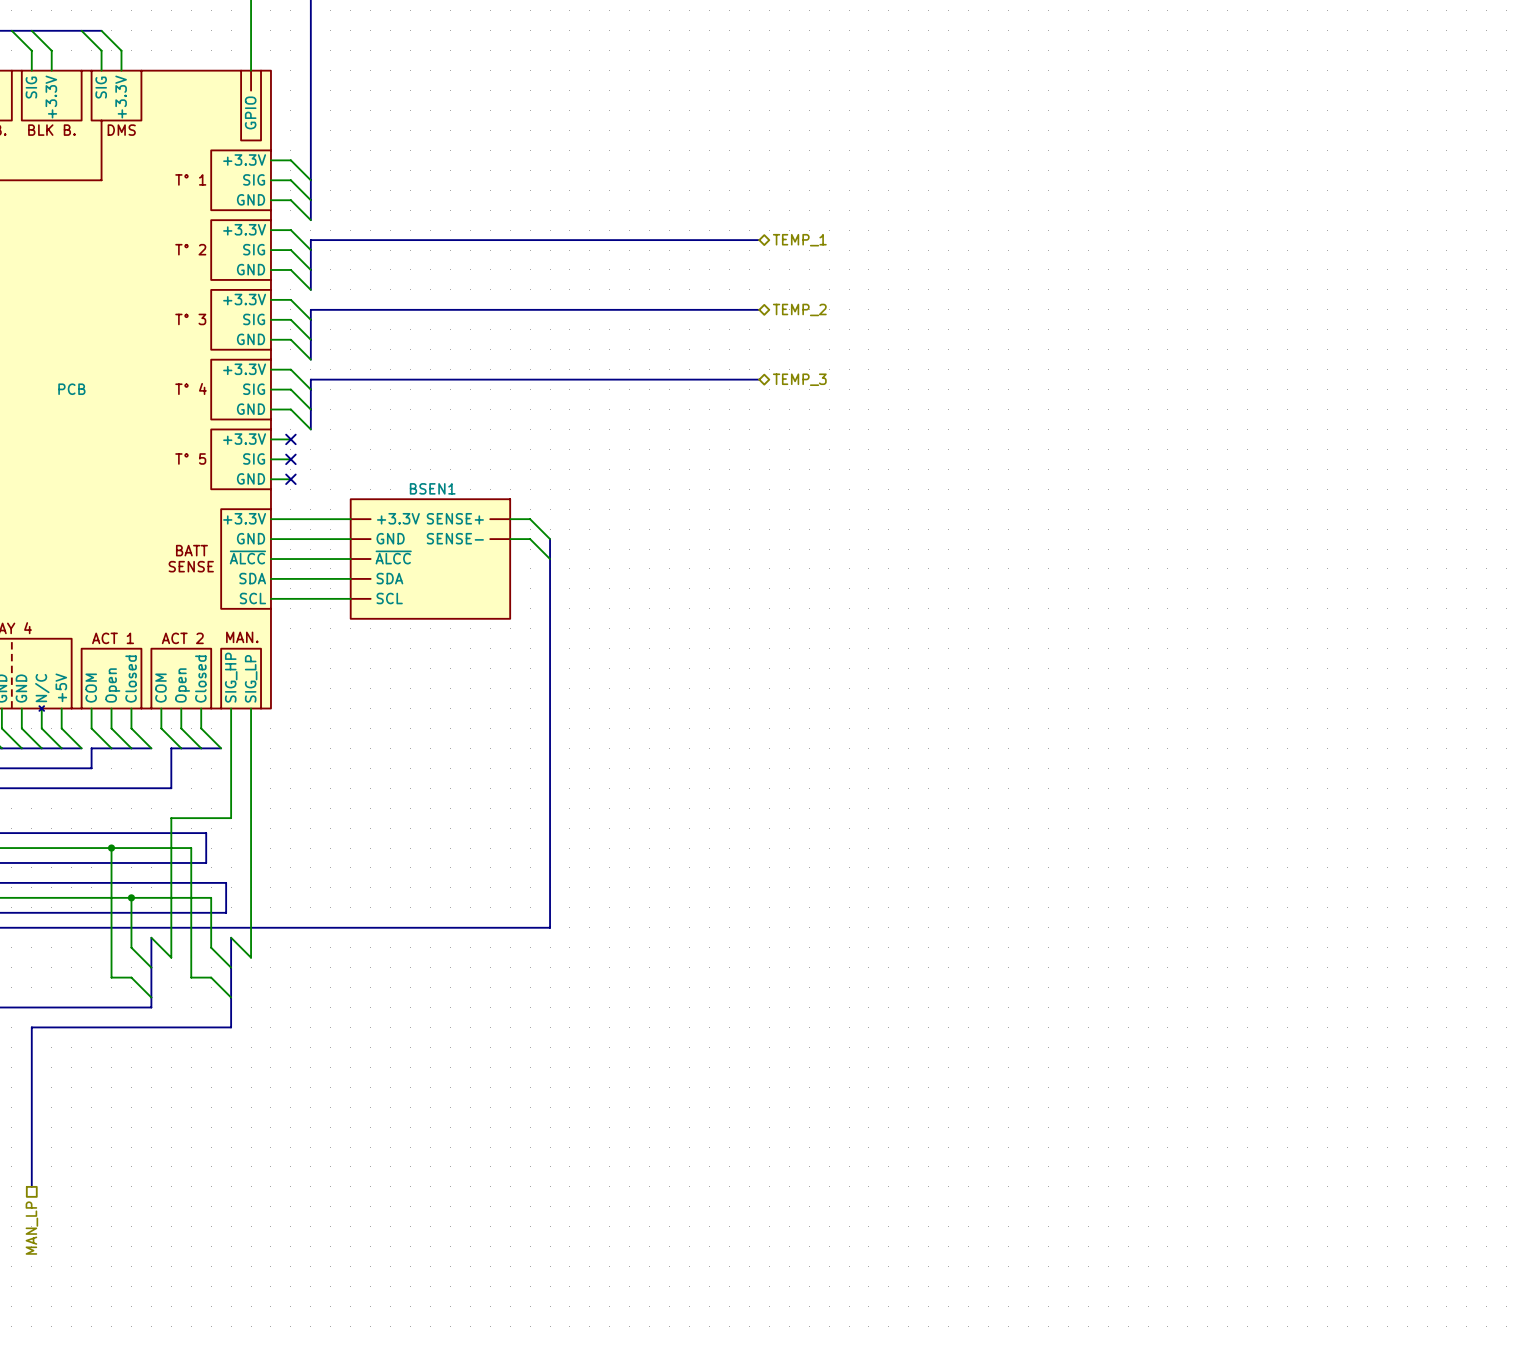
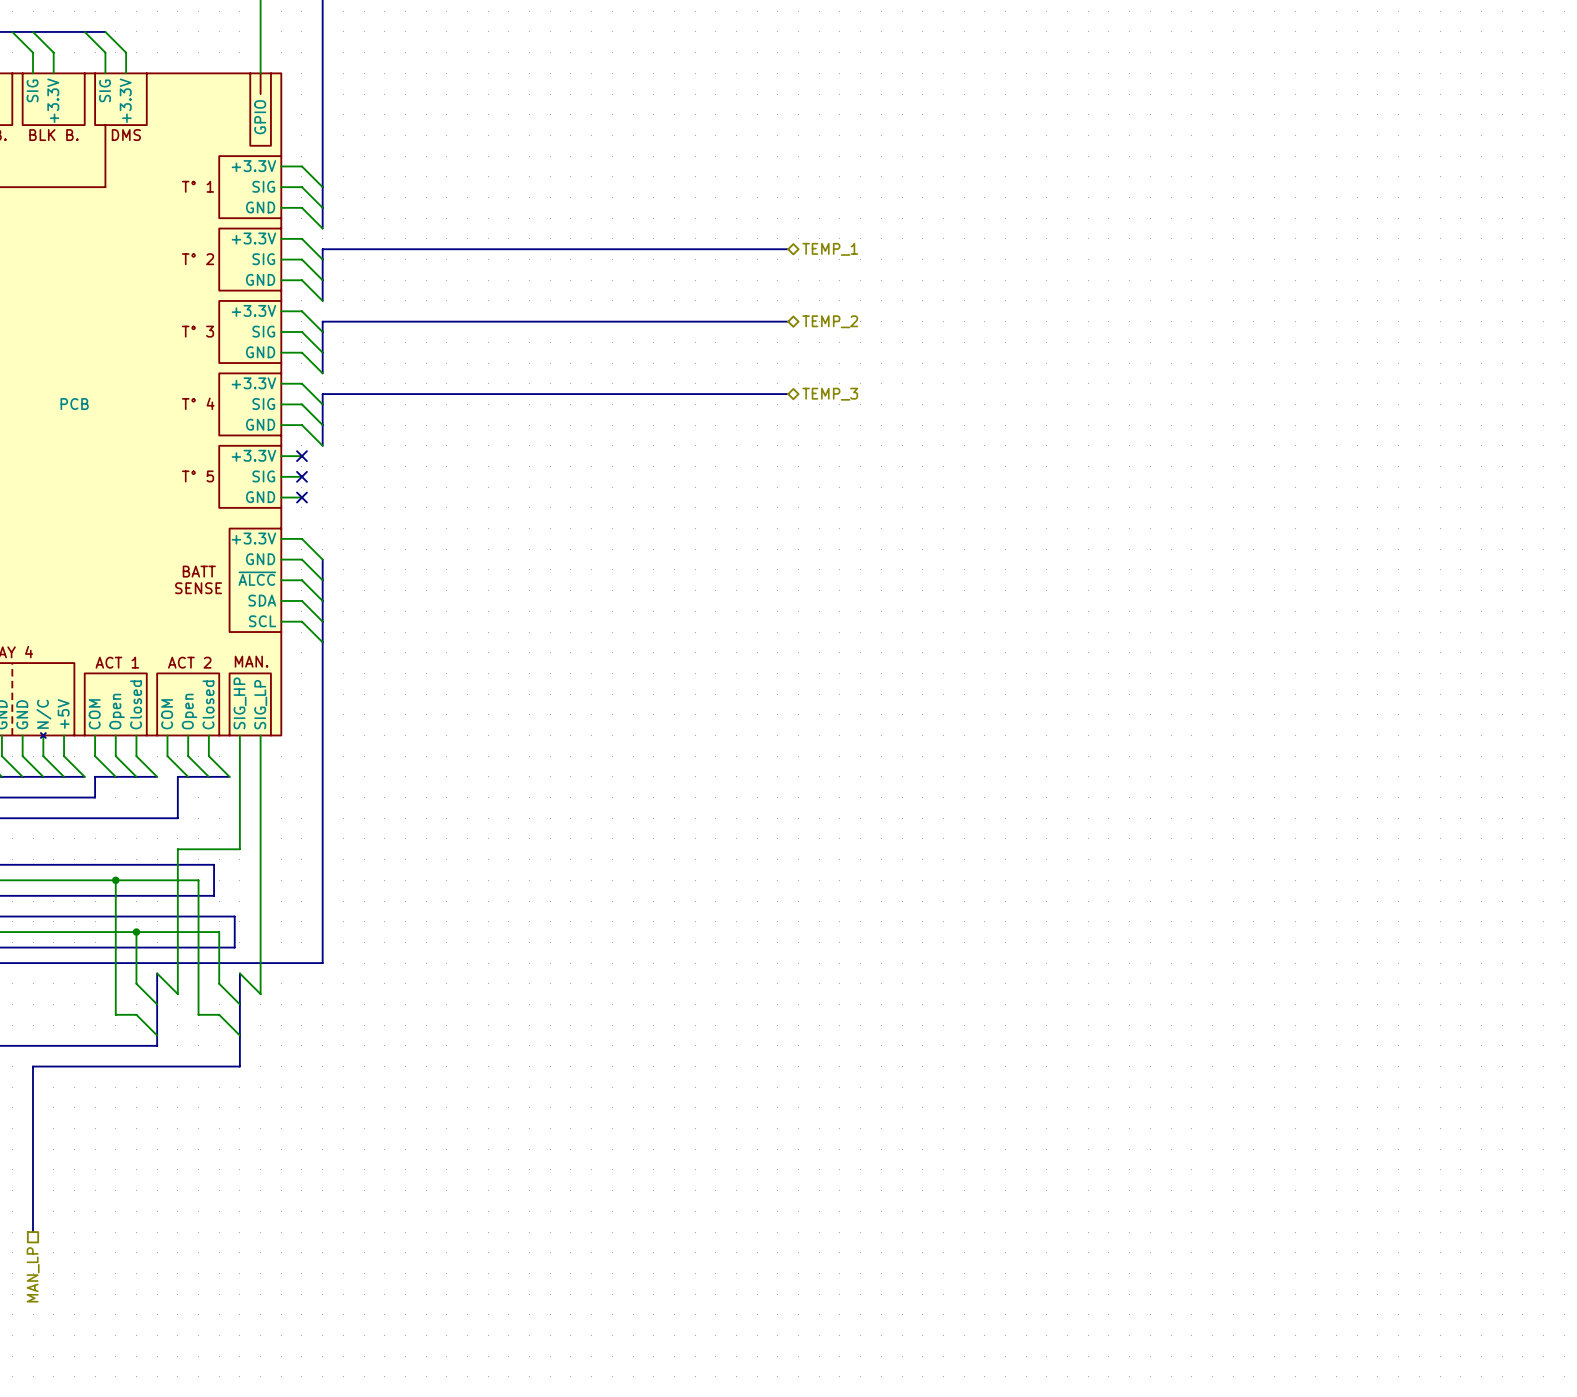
wire: (290, 519) (350, 519) -> (301, 538) (322, 559)
wire: (510, 519) (530, 519) (550, 539) -> none
wire: (290, 539) (350, 539) -> (301, 559) (322, 580)
wire: (510, 539) (530, 539) (550, 559) -> none
bus: (550, 539) (550, 927) (310, 927) -> (322, 559) (322, 963)
wire: (290, 559) (350, 559) -> (301, 580) (322, 600)
BSEN1: (430, 559) -> none
wire: (290, 578) (350, 578) -> (301, 600) (322, 621)
wire: (290, 598) (350, 598) -> (301, 621) (322, 642)

